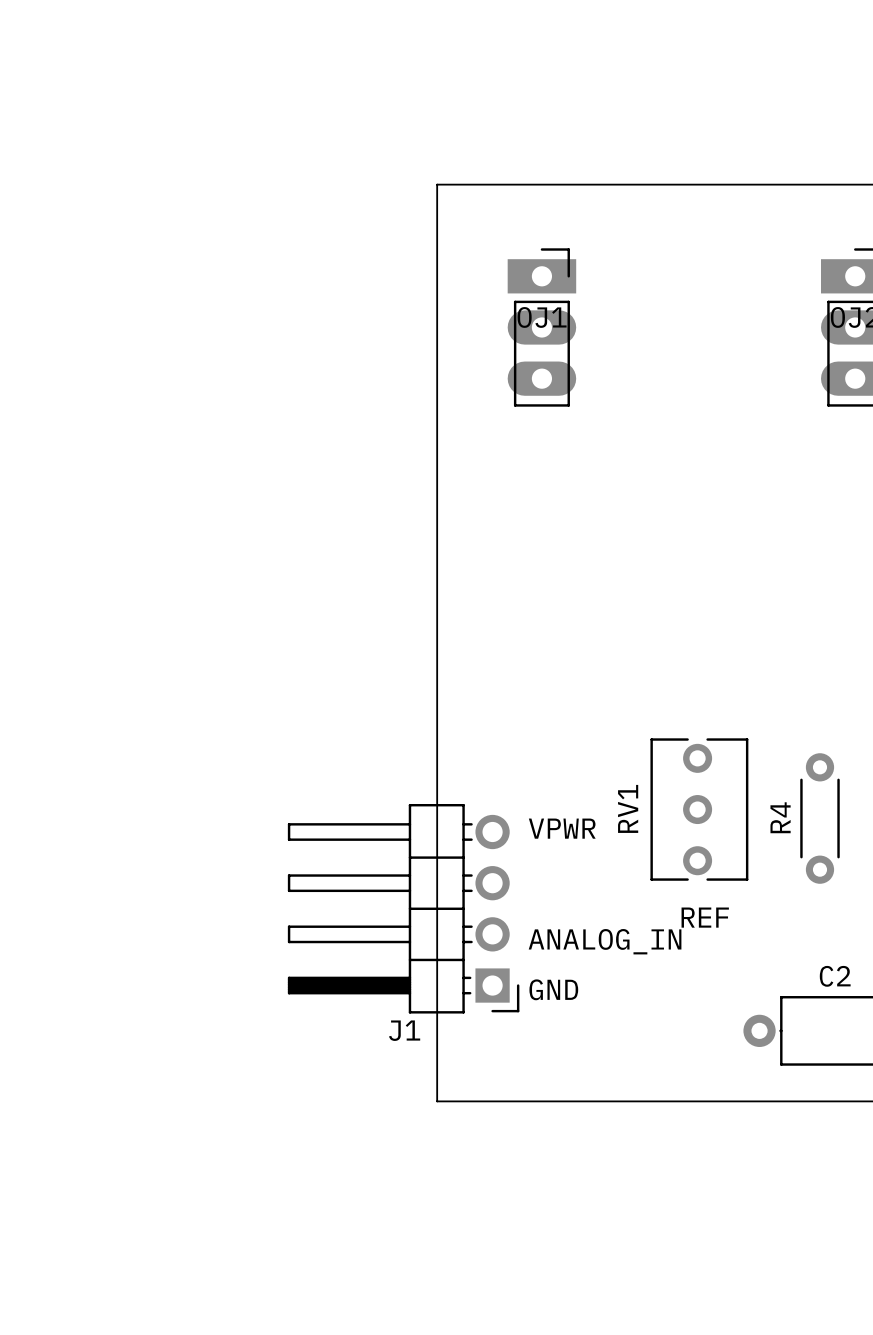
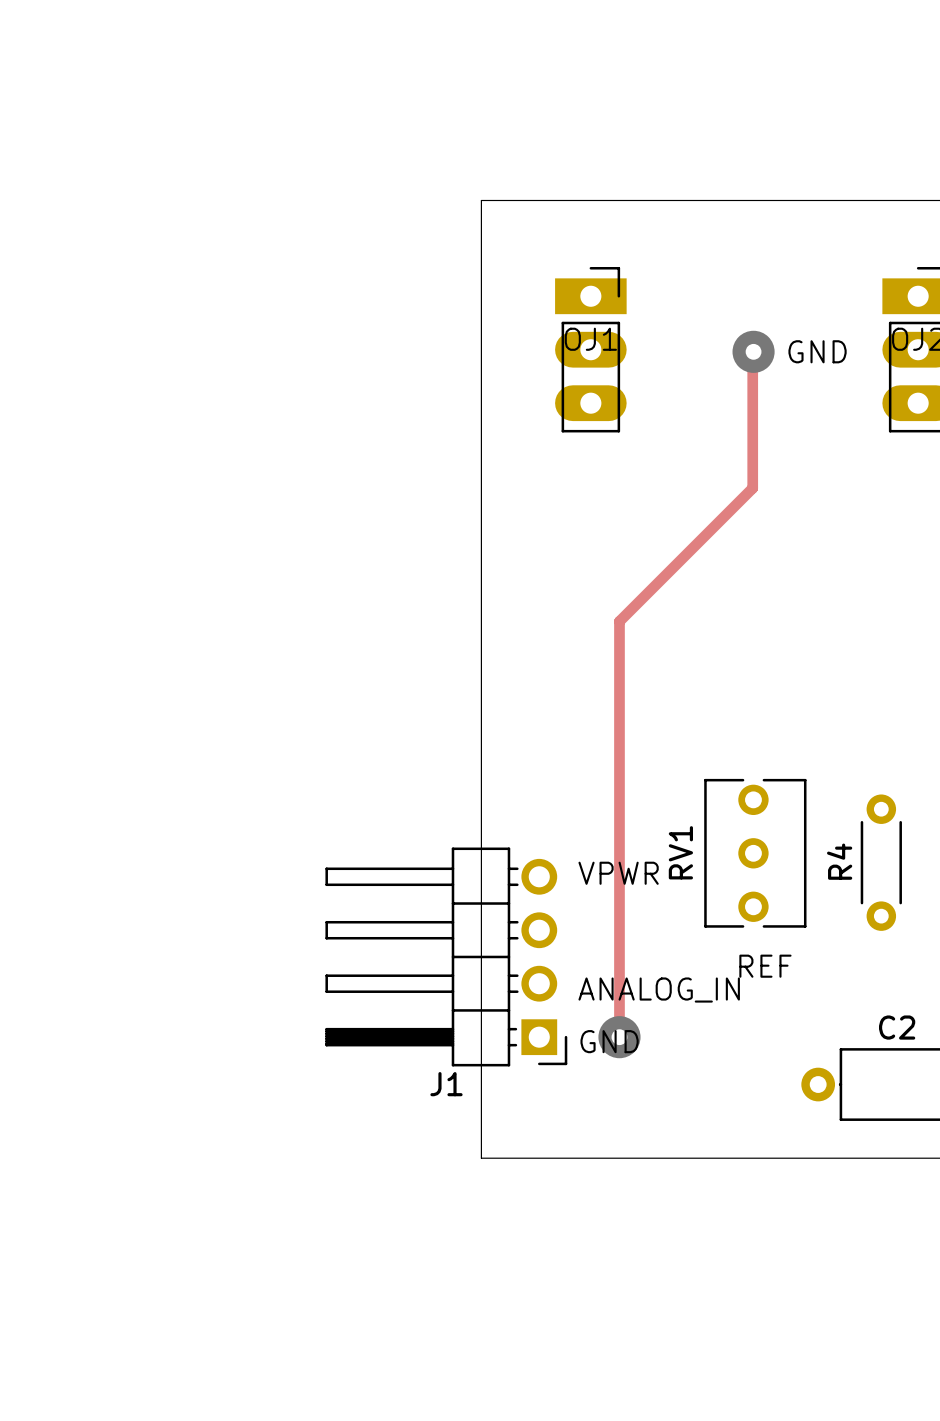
track: none -> (753, 351) (752, 488) (619, 621) (619, 1037)
via: none -> (753, 351)
text: none -> GND (817, 351)
via: none -> (619, 1037)

